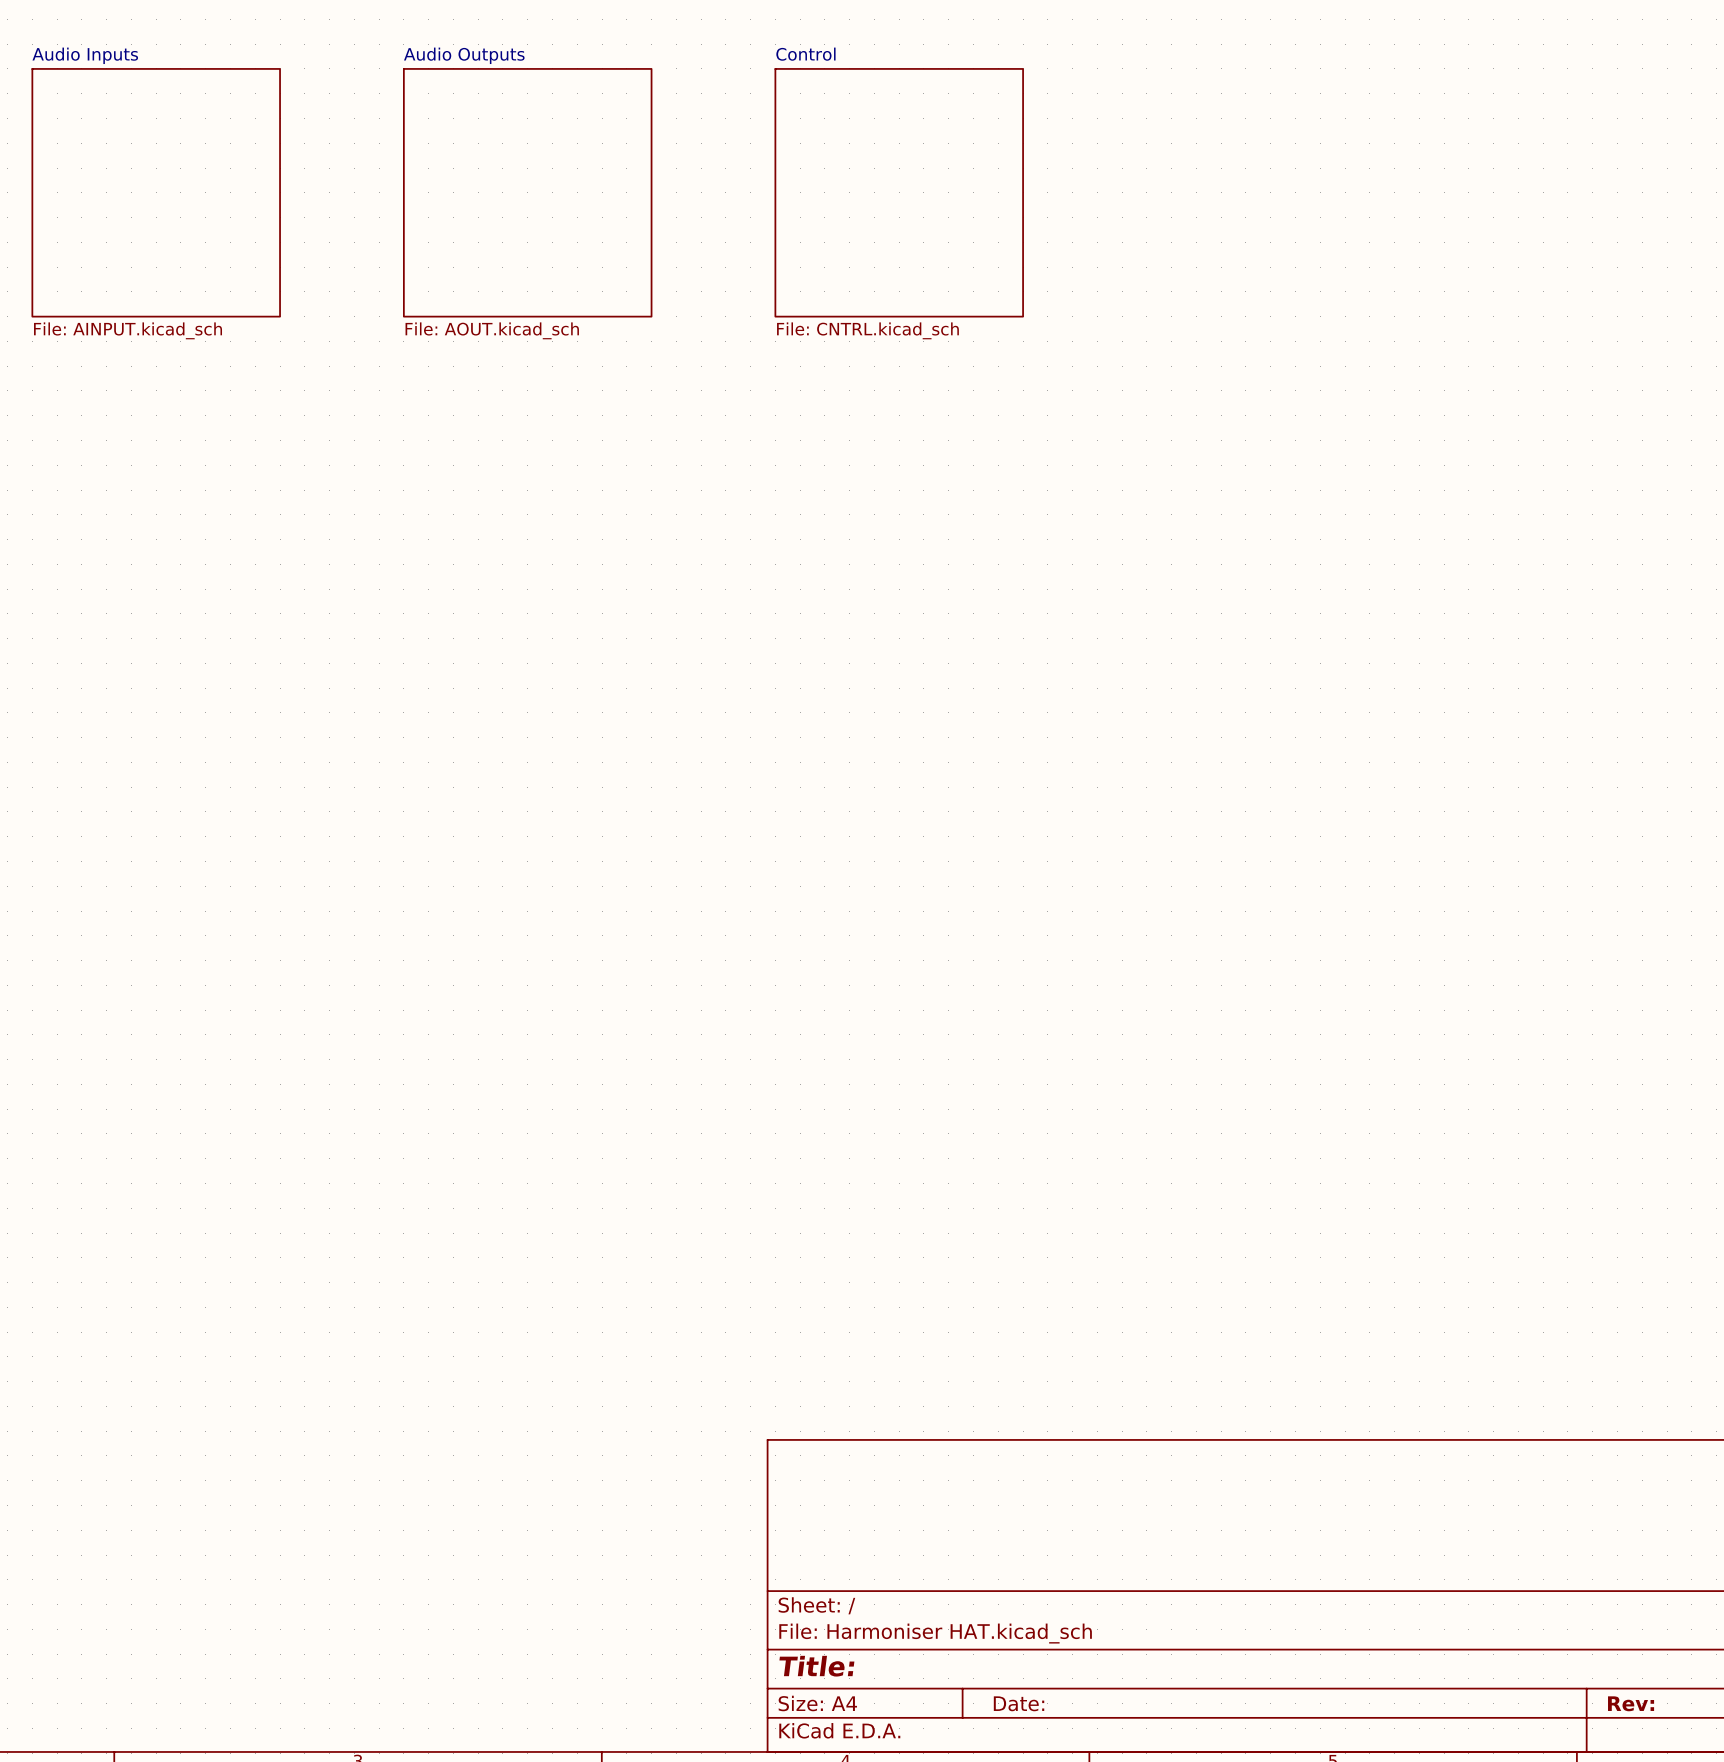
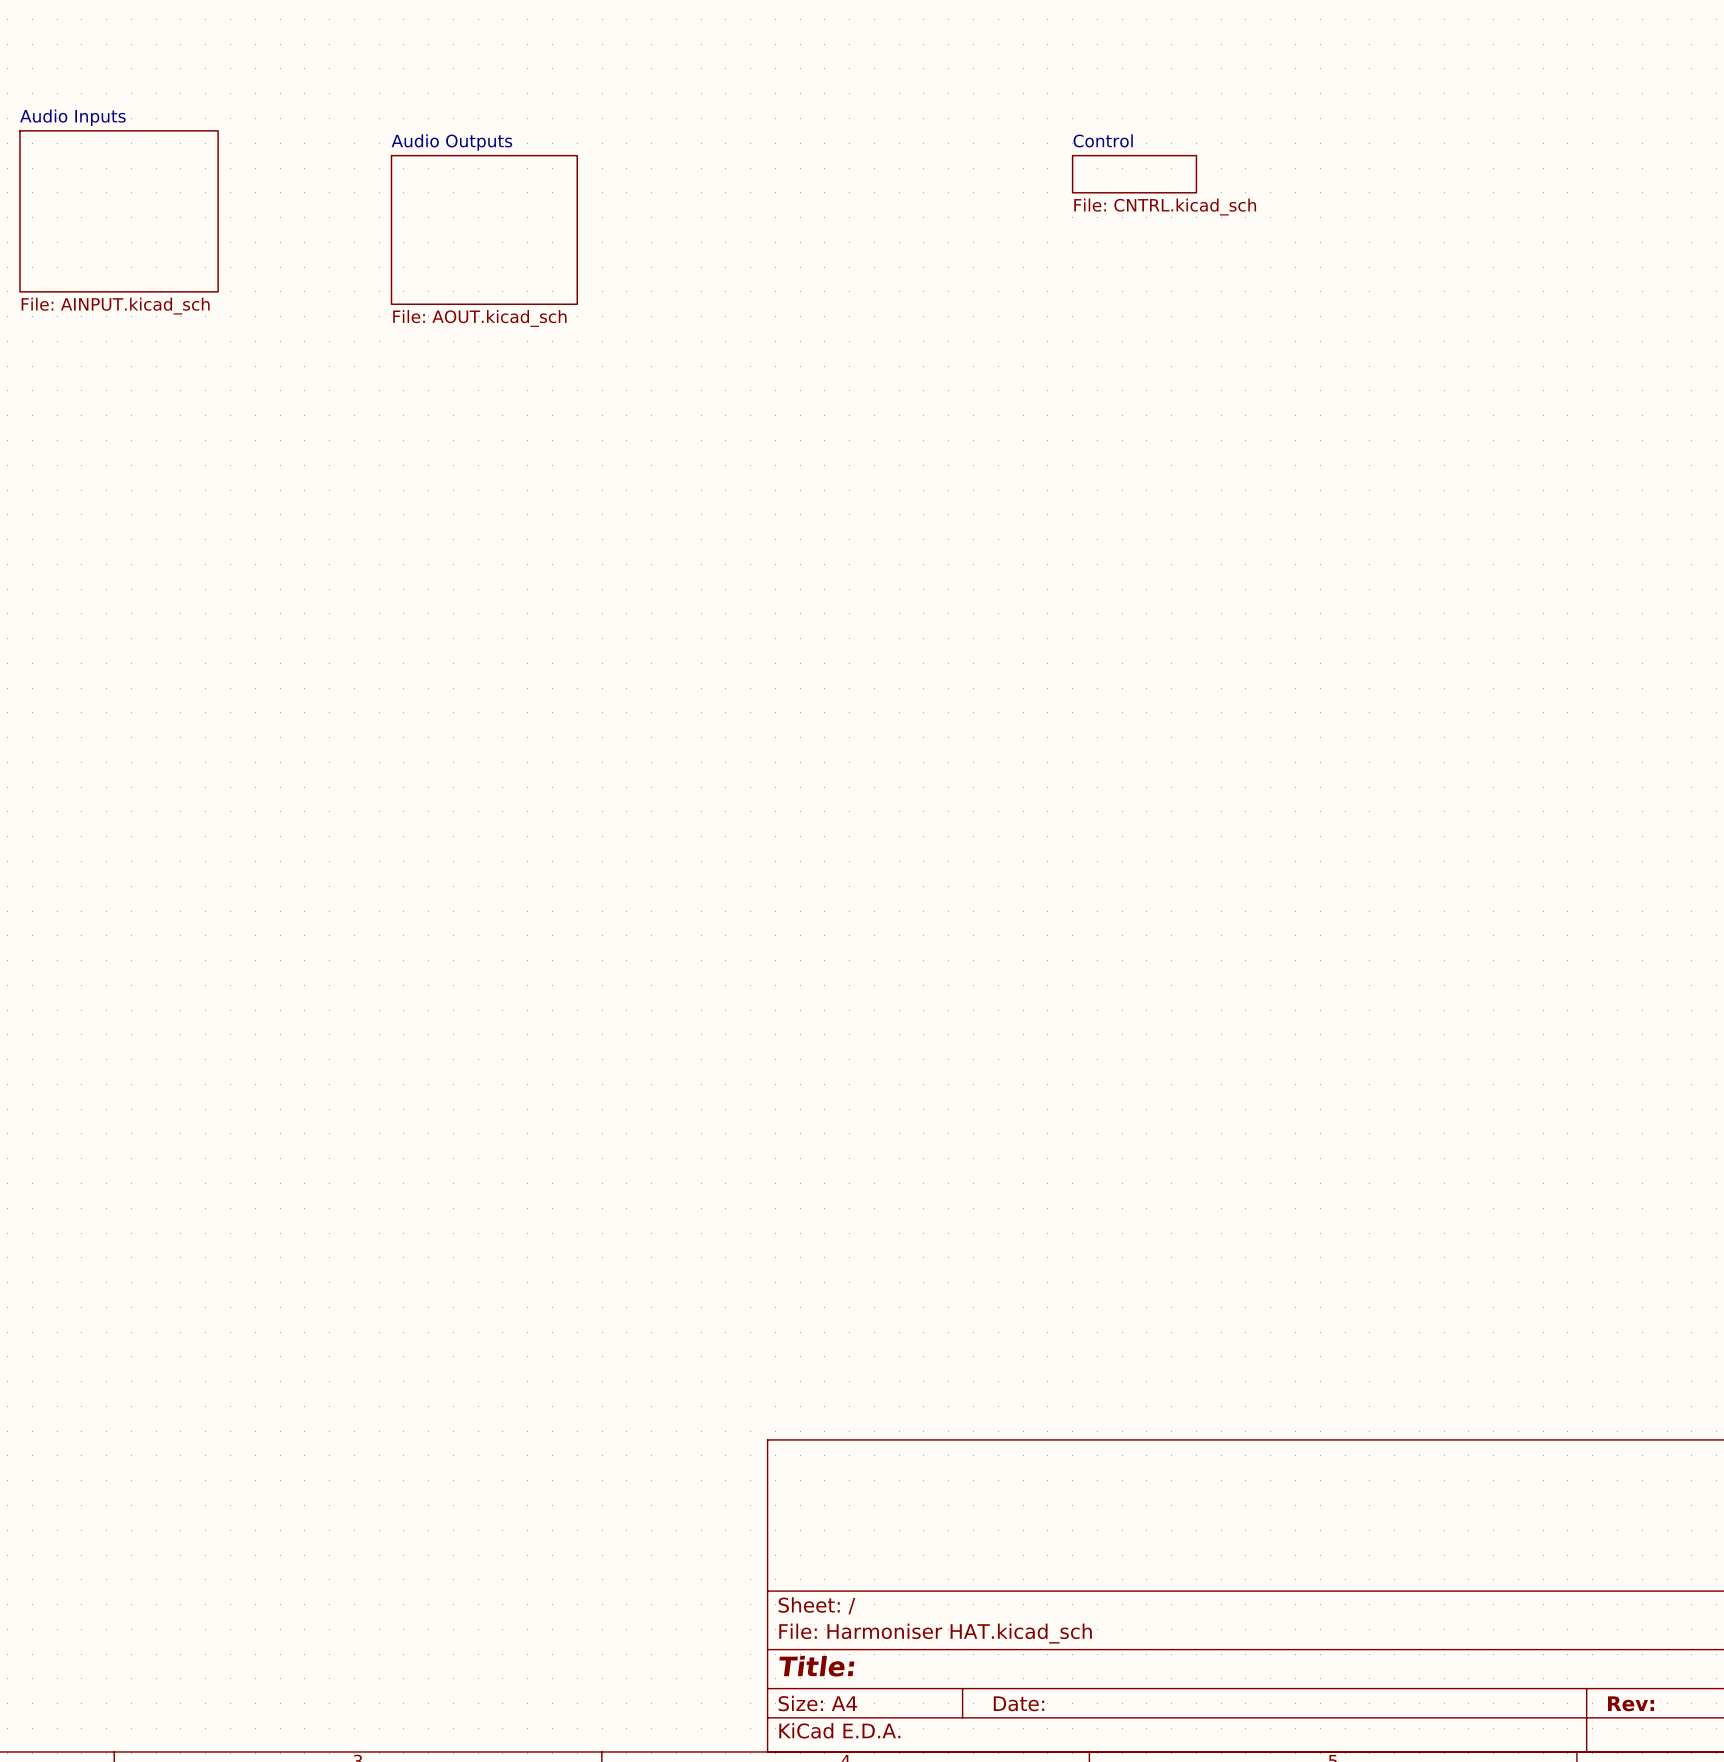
sheet Control: none -> File: CNTRL.kicad_sch (1134, 174)
sheet Audio Inputs: File: AINPUT.kicad_sch (156, 192) -> none
sheet Audio Outputs: File: AOUT.kicad_sch (527, 192) -> none
sheet Control: File: CNTRL.kicad_sch (899, 192) -> none
sheet Audio Inputs: none -> File: AINPUT.kicad_sch (119, 211)
sheet Audio Outputs: none -> File: AOUT.kicad_sch (484, 229)

